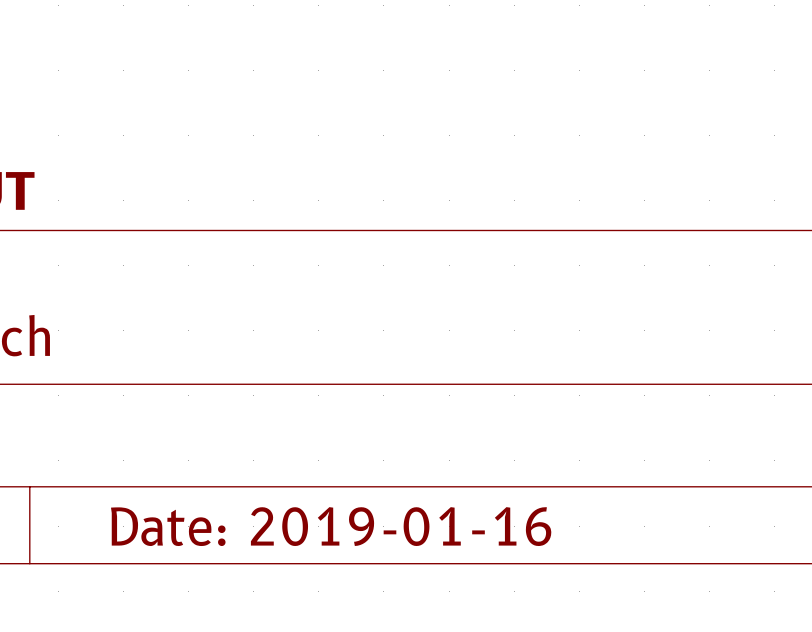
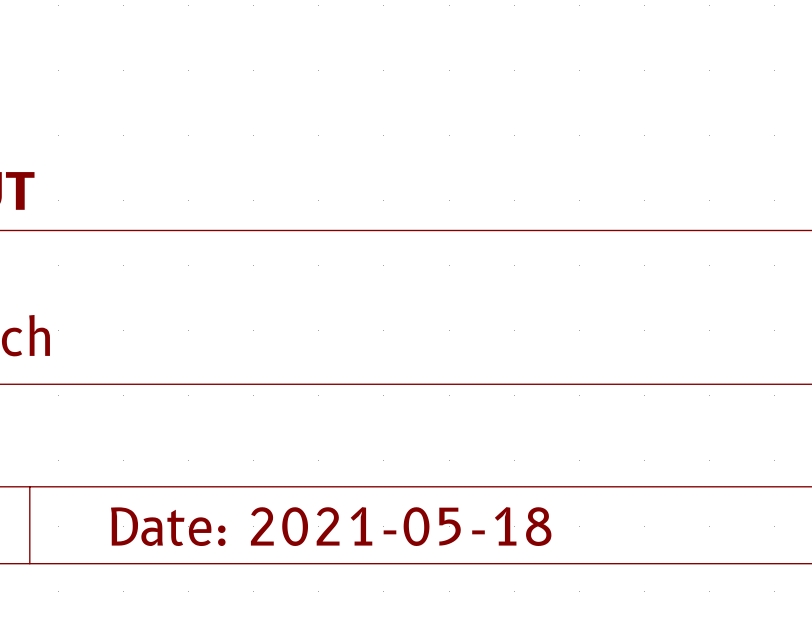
title block: Date: 2019-01-16 (331, 526) -> Date: 2021-05-18 (331, 526)

